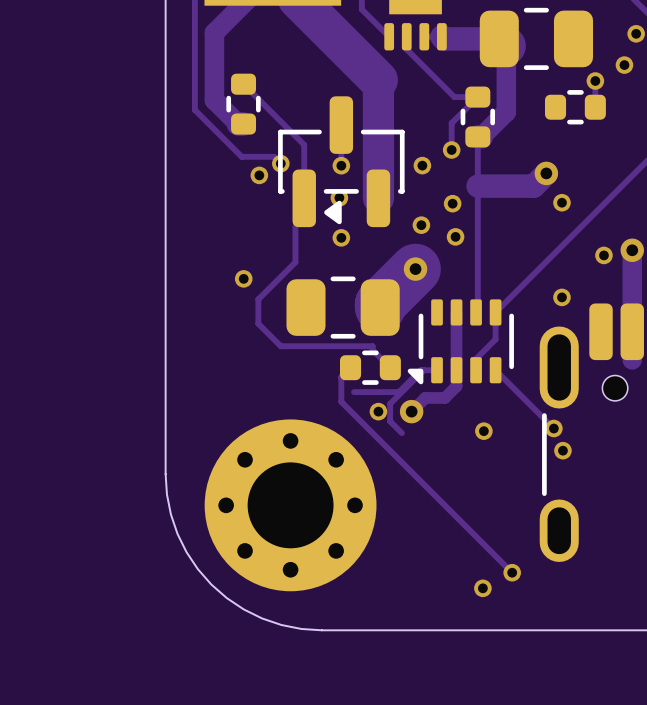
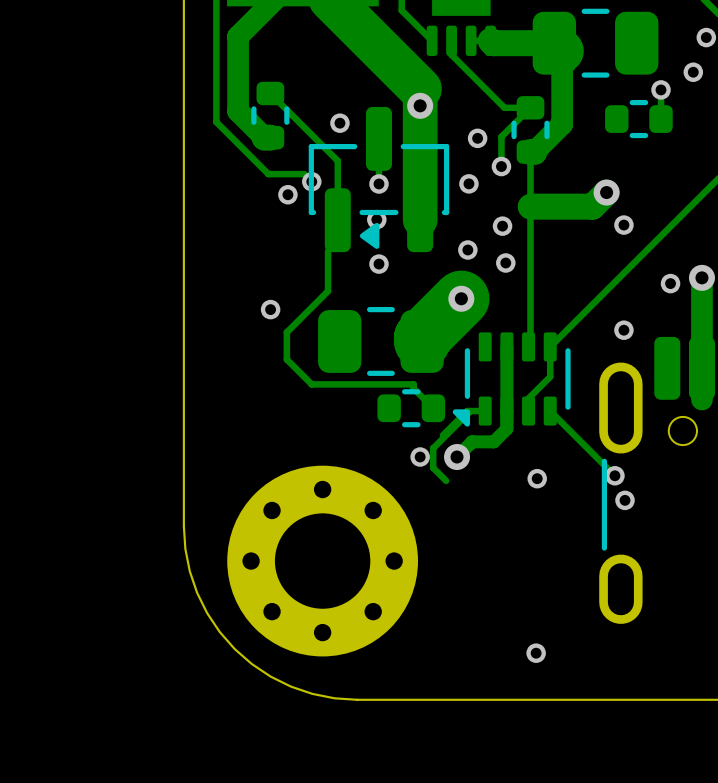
via: none -> (420, 105)
via: none -> (339, 123)
via: none -> (477, 138)
track: (350, 367) (341, 376) (341, 401) (512, 572) -> none
track: (398, 392) (354, 392) -> none
via: (512, 572) -> none

